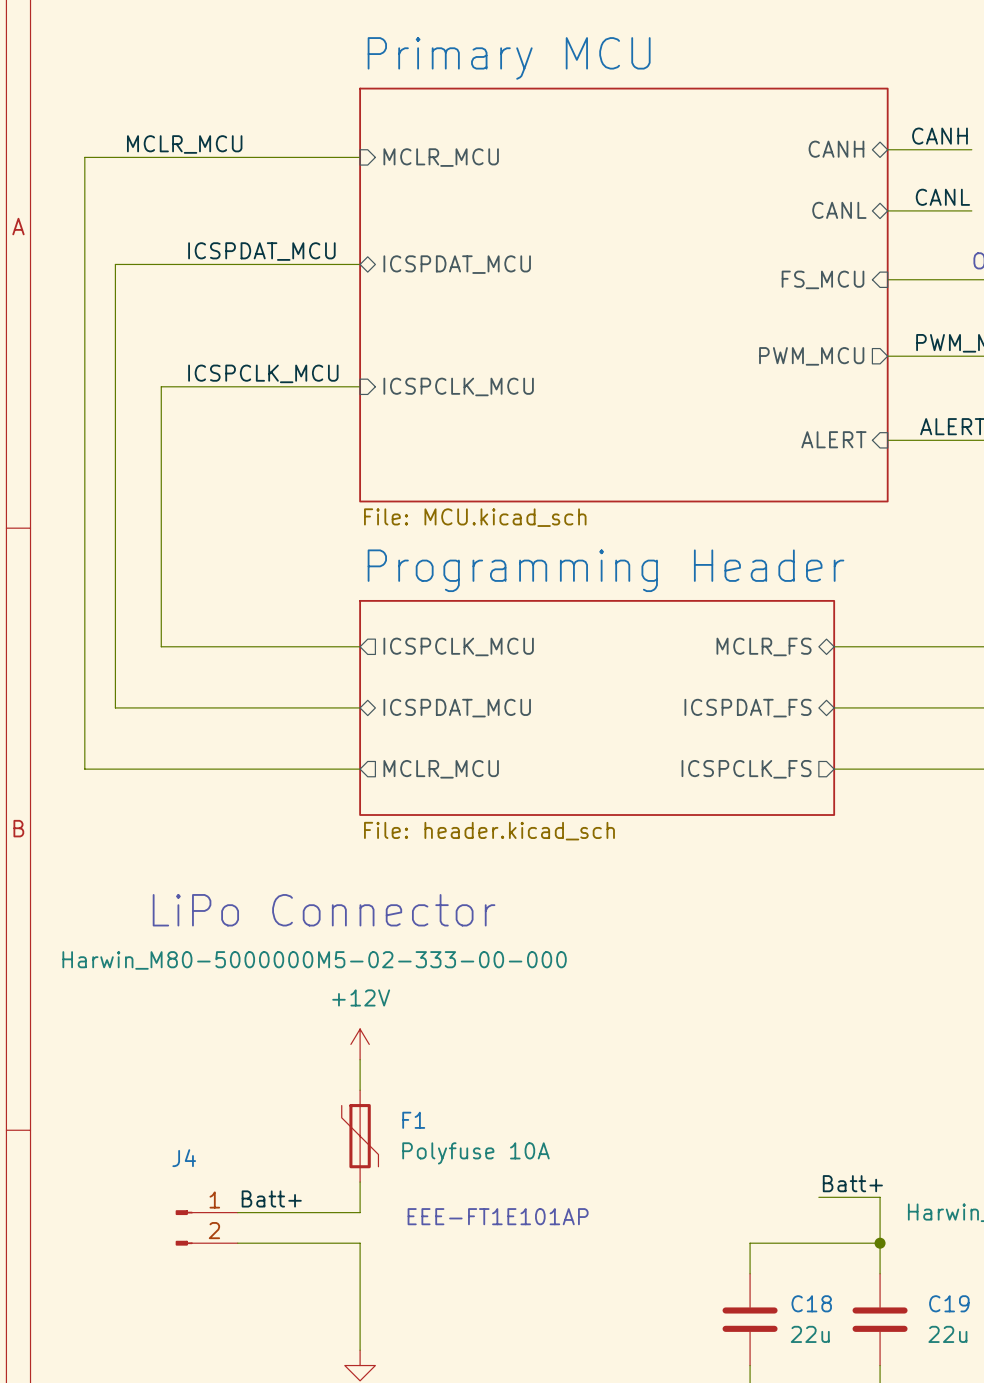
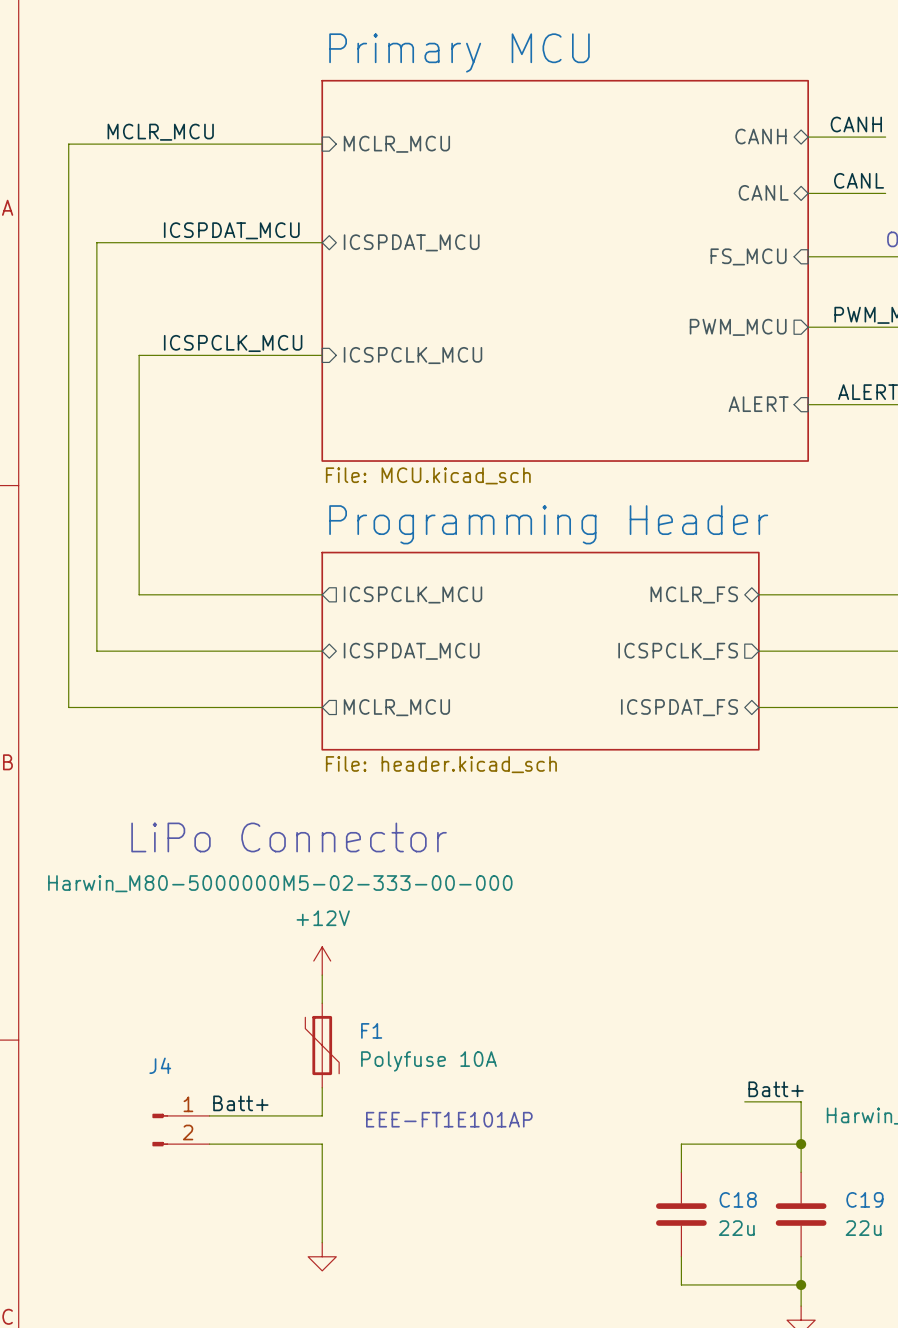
sheet pin shape: bidirectional (748, 708) -> output (678, 651)
sheet pin: ICSPDAT_FS (748, 708) -> ICSPCLK_FS (678, 651)
sheet pin shape: output (746, 769) -> bidirectional (679, 707)
sheet pin: ICSPCLK_FS (746, 769) -> ICSPDAT_FS (679, 707)

